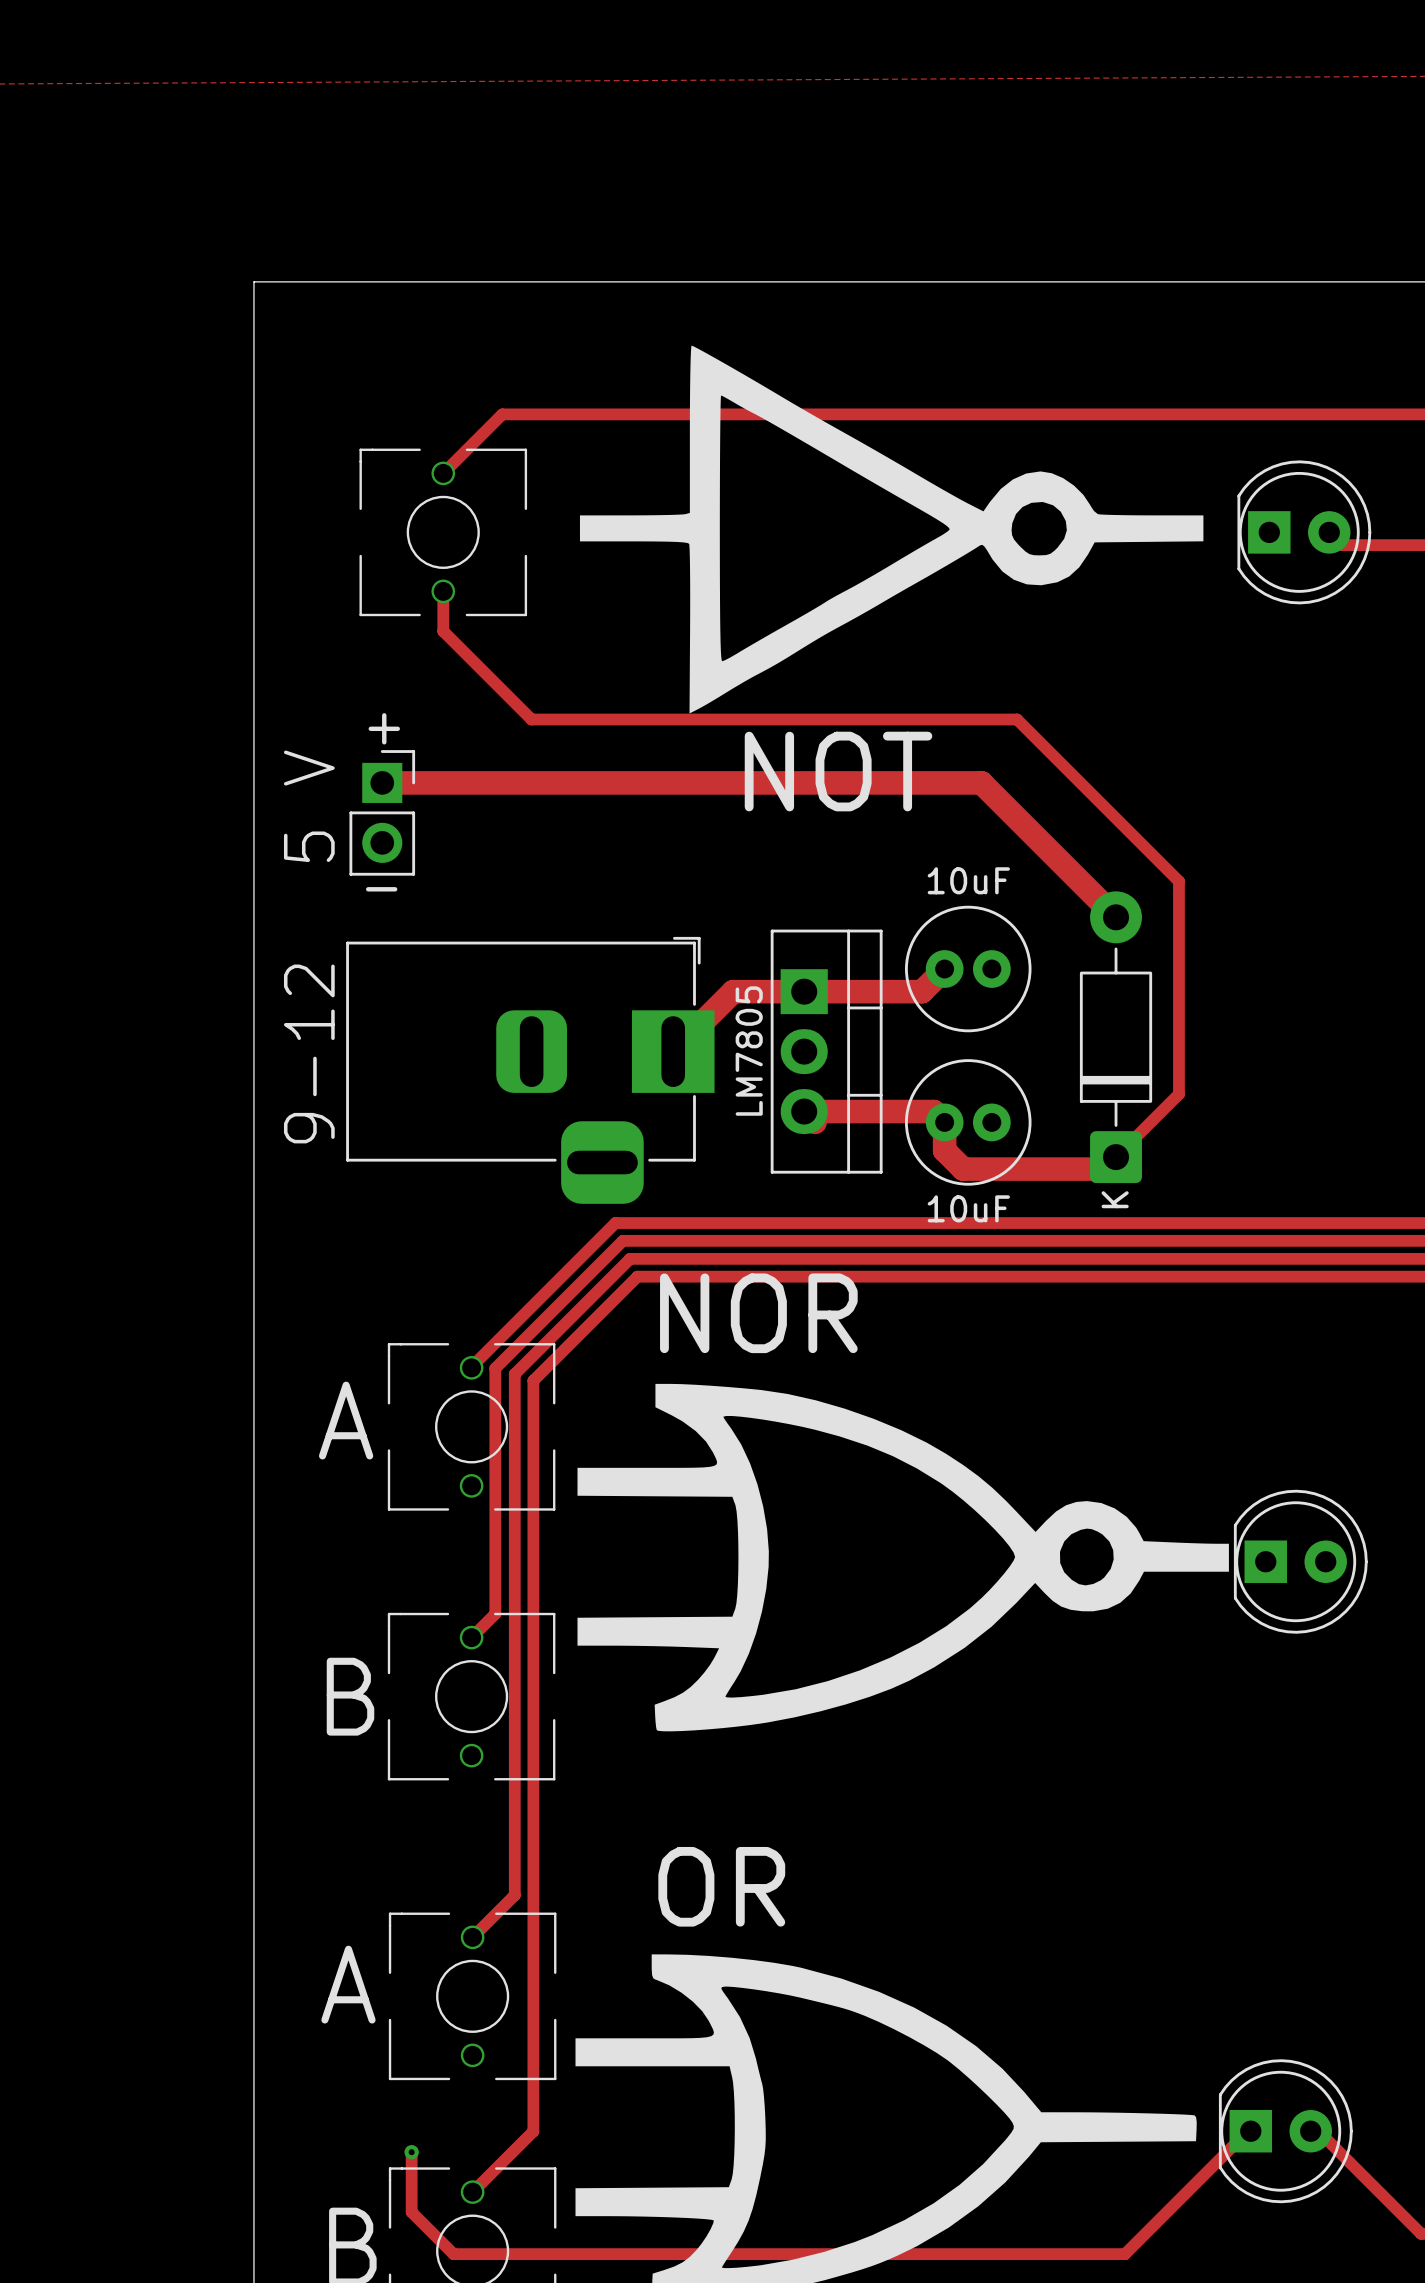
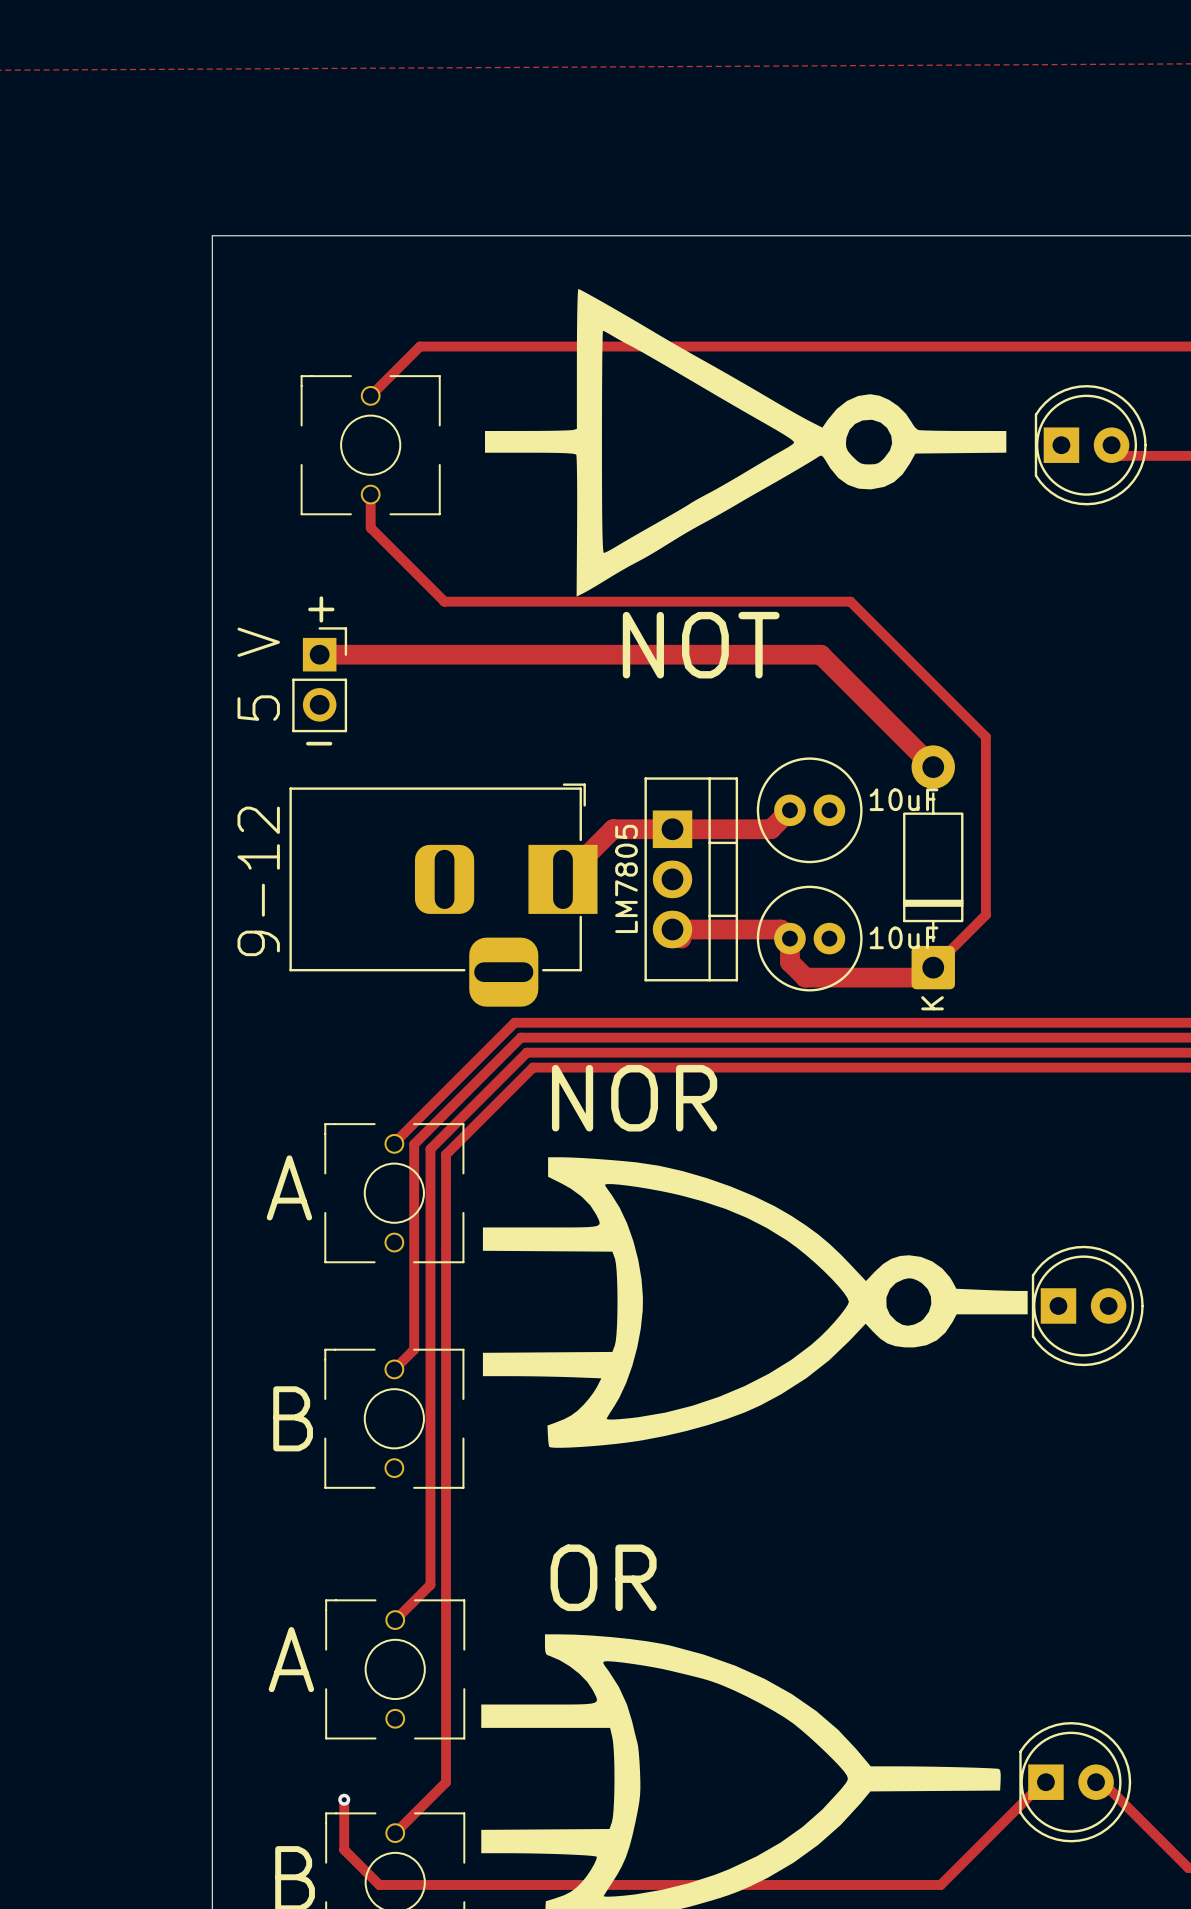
text: 10uF (968, 880) -> none
text: none -> 10uF (904, 799)
text: none -> 10uF (904, 937)
text: 10uF (968, 1208) -> none

